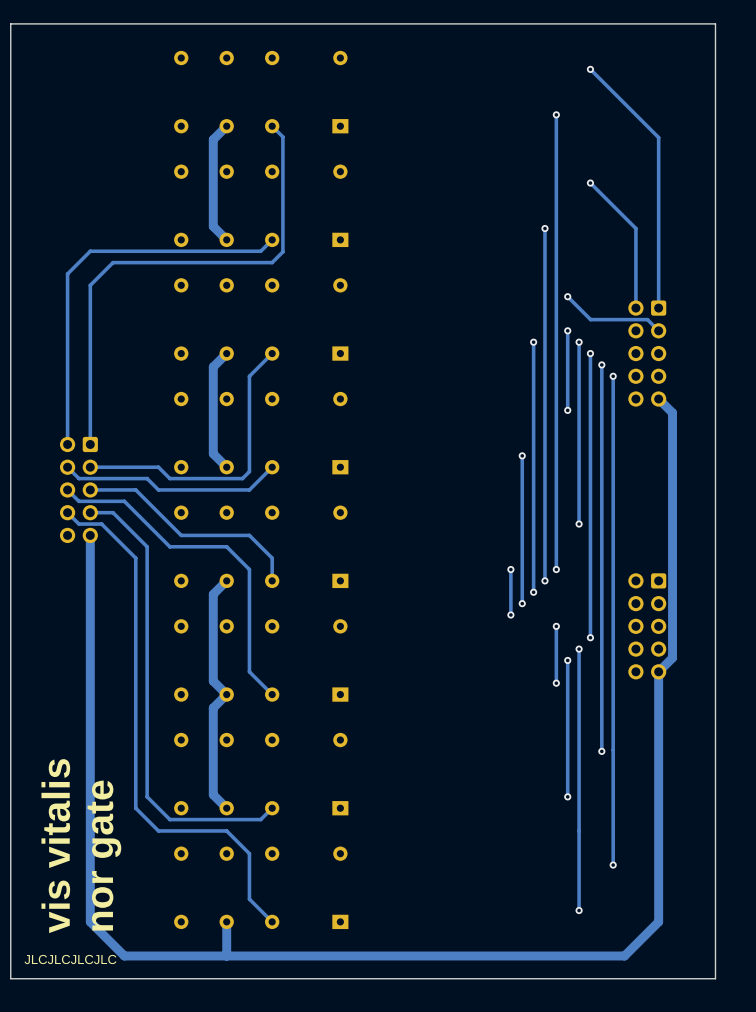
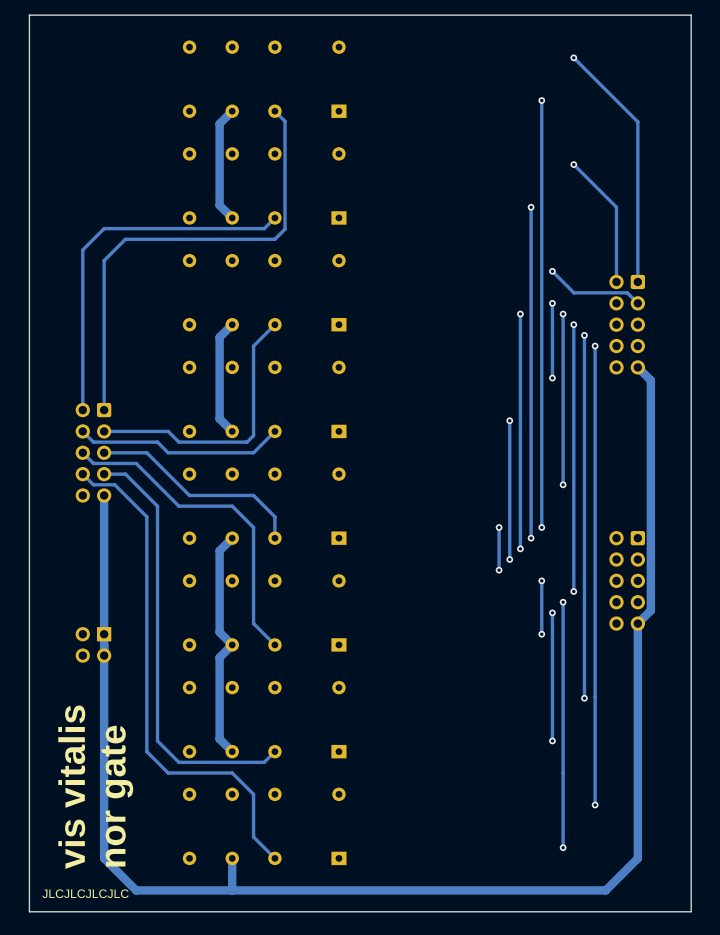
part: none -> (93, 644)

